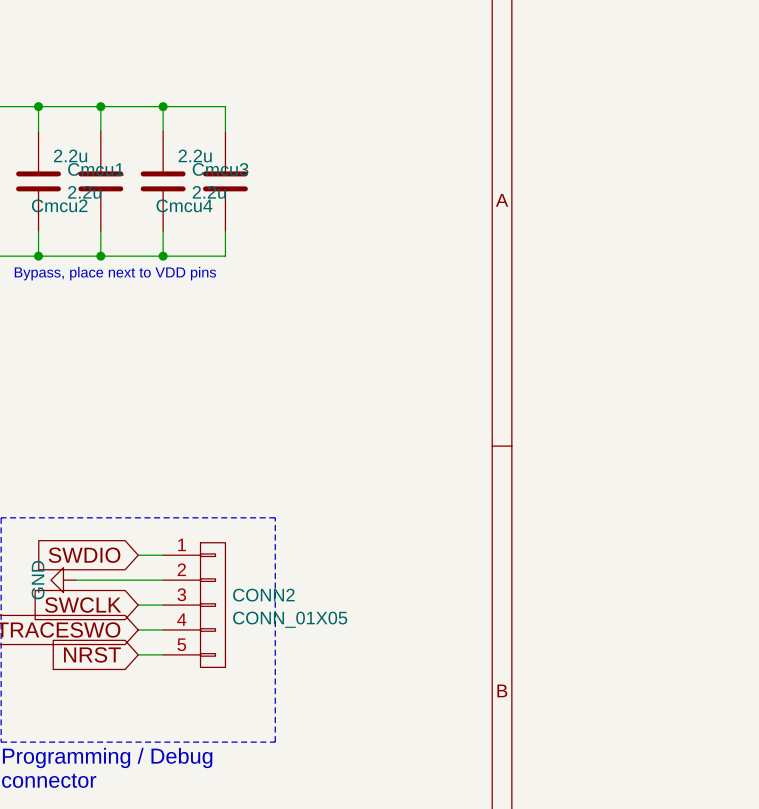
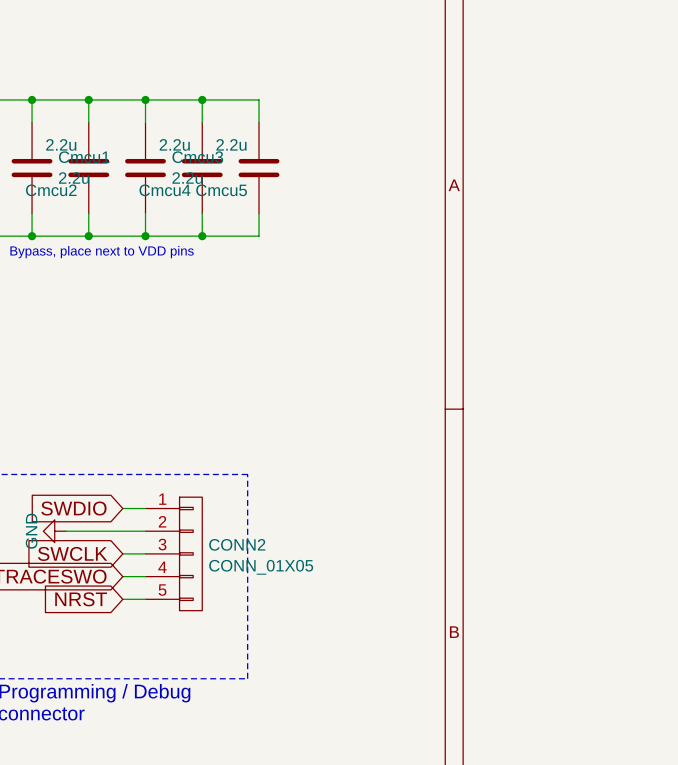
wire: none -> (202, 99) (259, 99) (259, 122)
junction: none -> (202, 99)
Cmcu5: none -> 2.2u (259, 168)
wire: none -> (259, 213) (259, 236) (202, 236)
junction: none -> (202, 236)

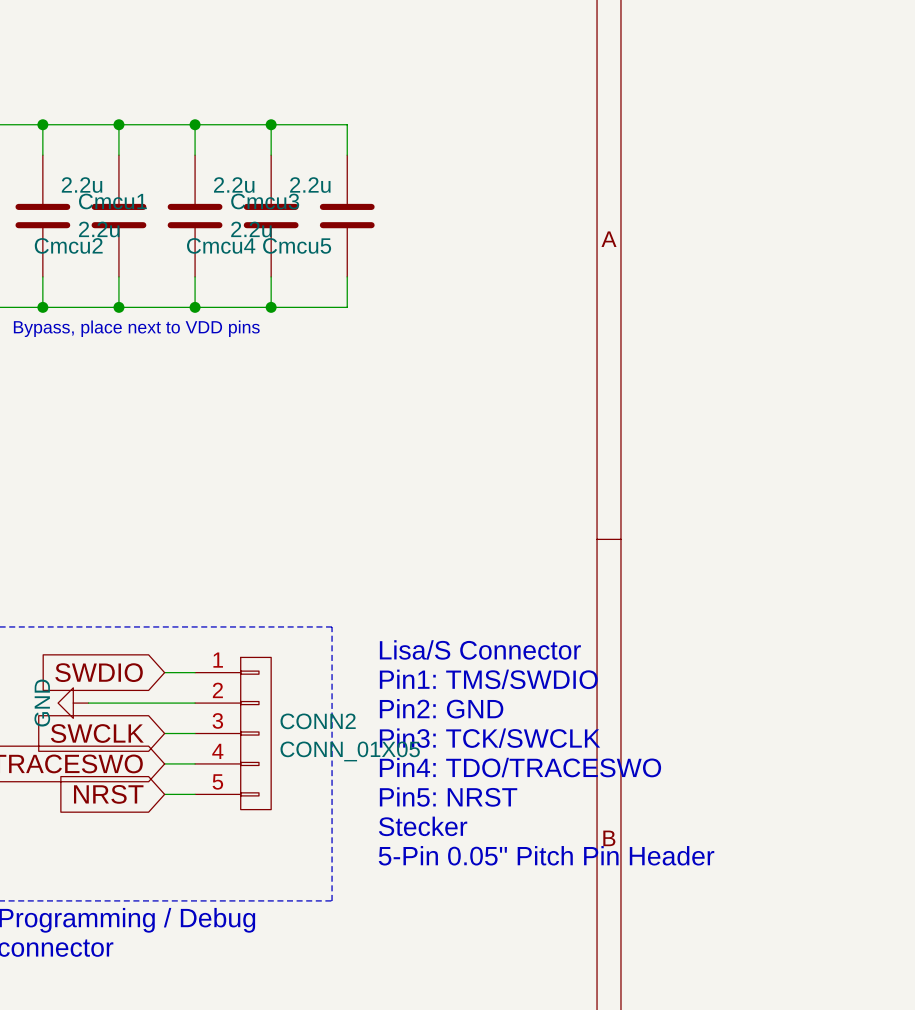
text: none -> Lisa/S Connector (480, 649)
text: none -> Pin1: TMS/SWDIO (488, 679)
text: none -> Pin2: GND (441, 708)
text: none -> Pin3: TCK/SWCLK (490, 738)
text: none -> Pin4: TDO/TRACESWO (520, 767)
text: none -> Pin5: NRST (448, 796)
text: none -> Stecker (423, 826)
text: none -> 5-Pin 0.05" Pitch Pin Header (546, 855)

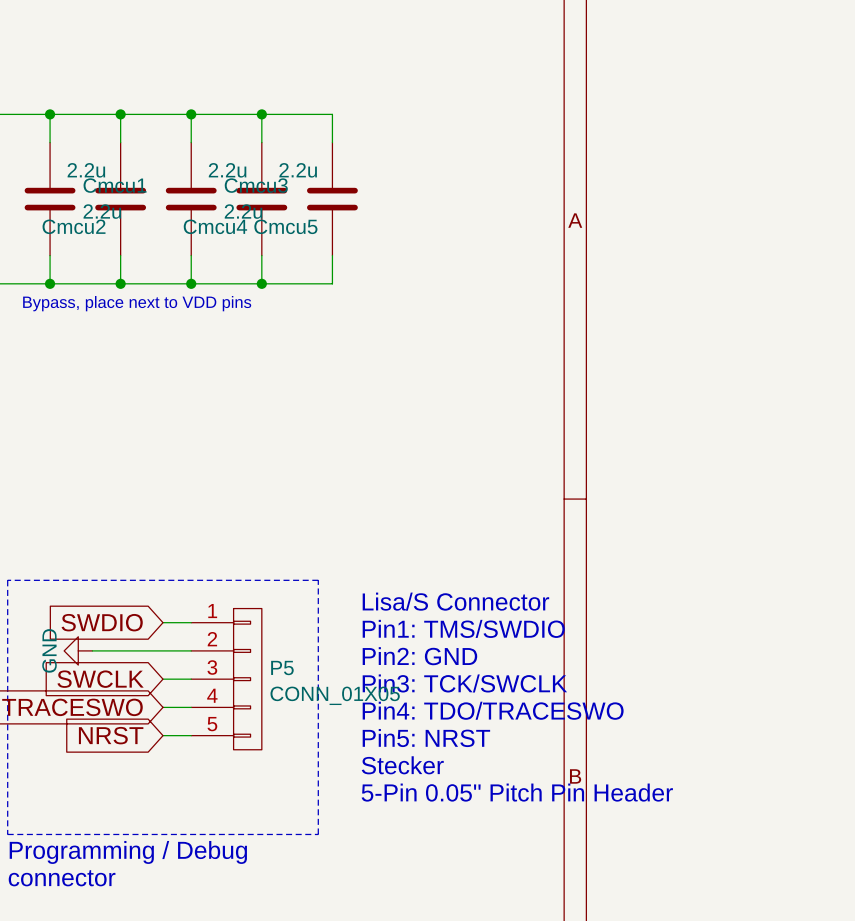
CONN2 name: CONN2 (318, 721) -> P5 (282, 668)

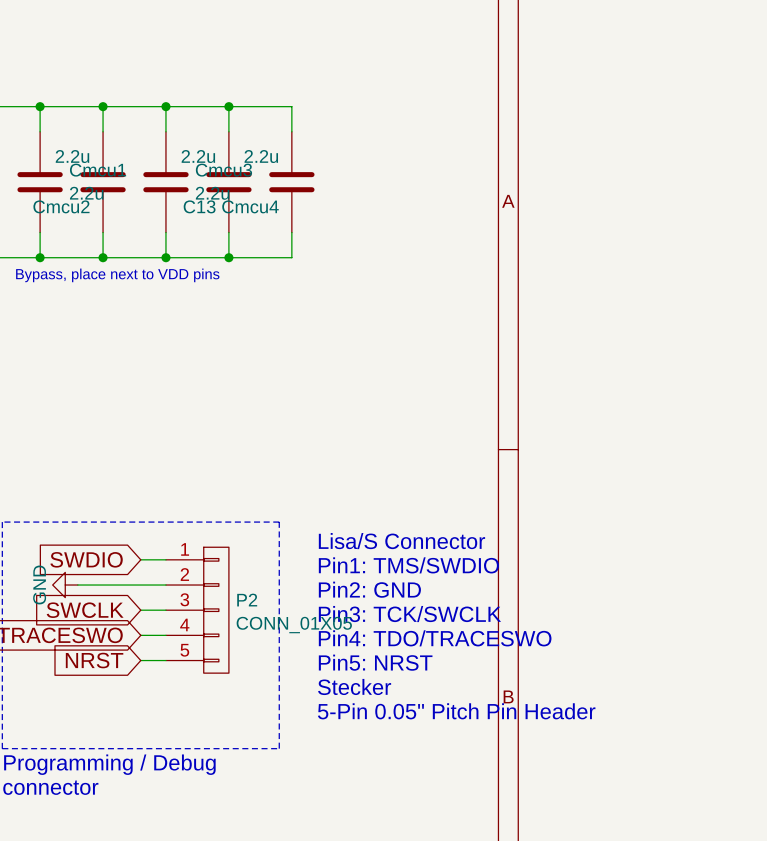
Cmcu4 name: Cmcu4 (215, 226) -> C13 (199, 206)
Cmcu5 name: Cmcu5 (285, 226) -> Cmcu4 (250, 206)
P5 name: P5 (282, 668) -> P2 (247, 600)

